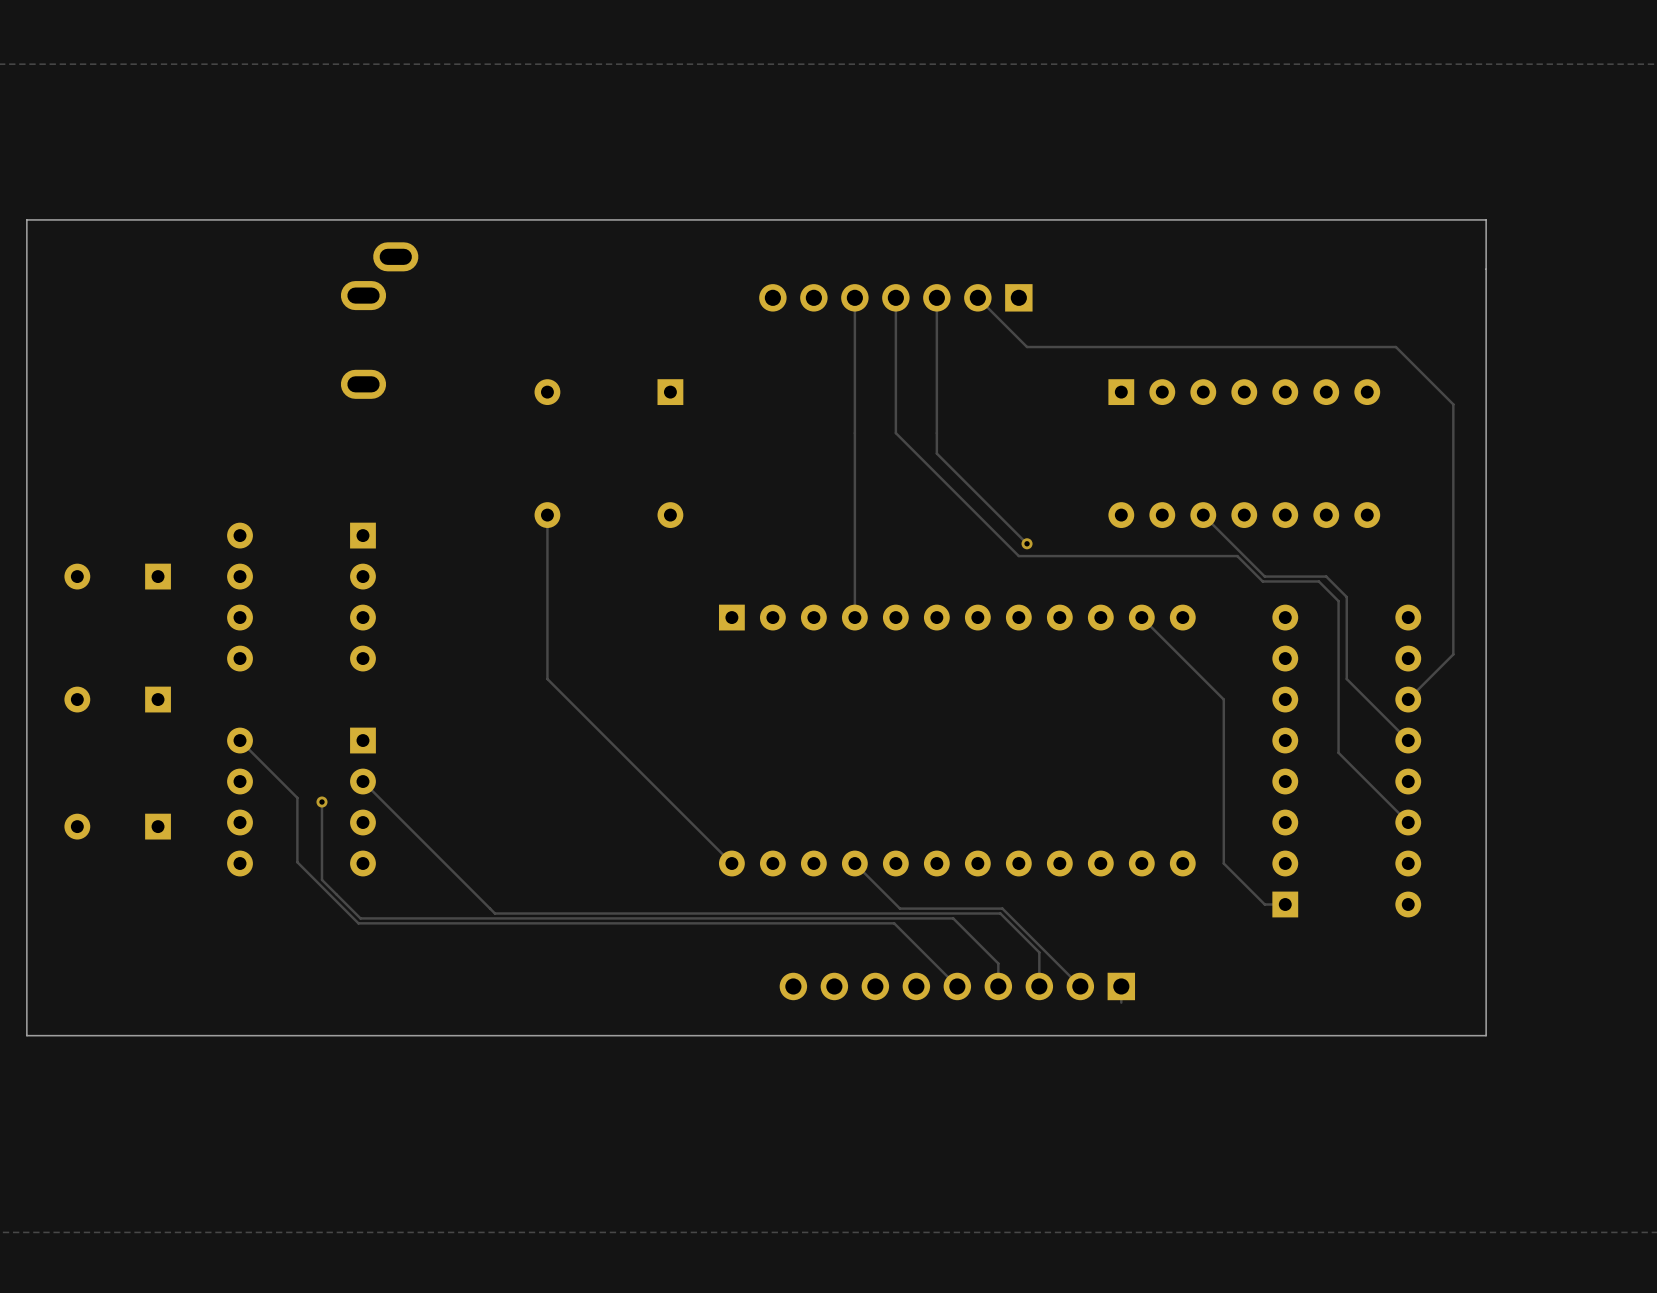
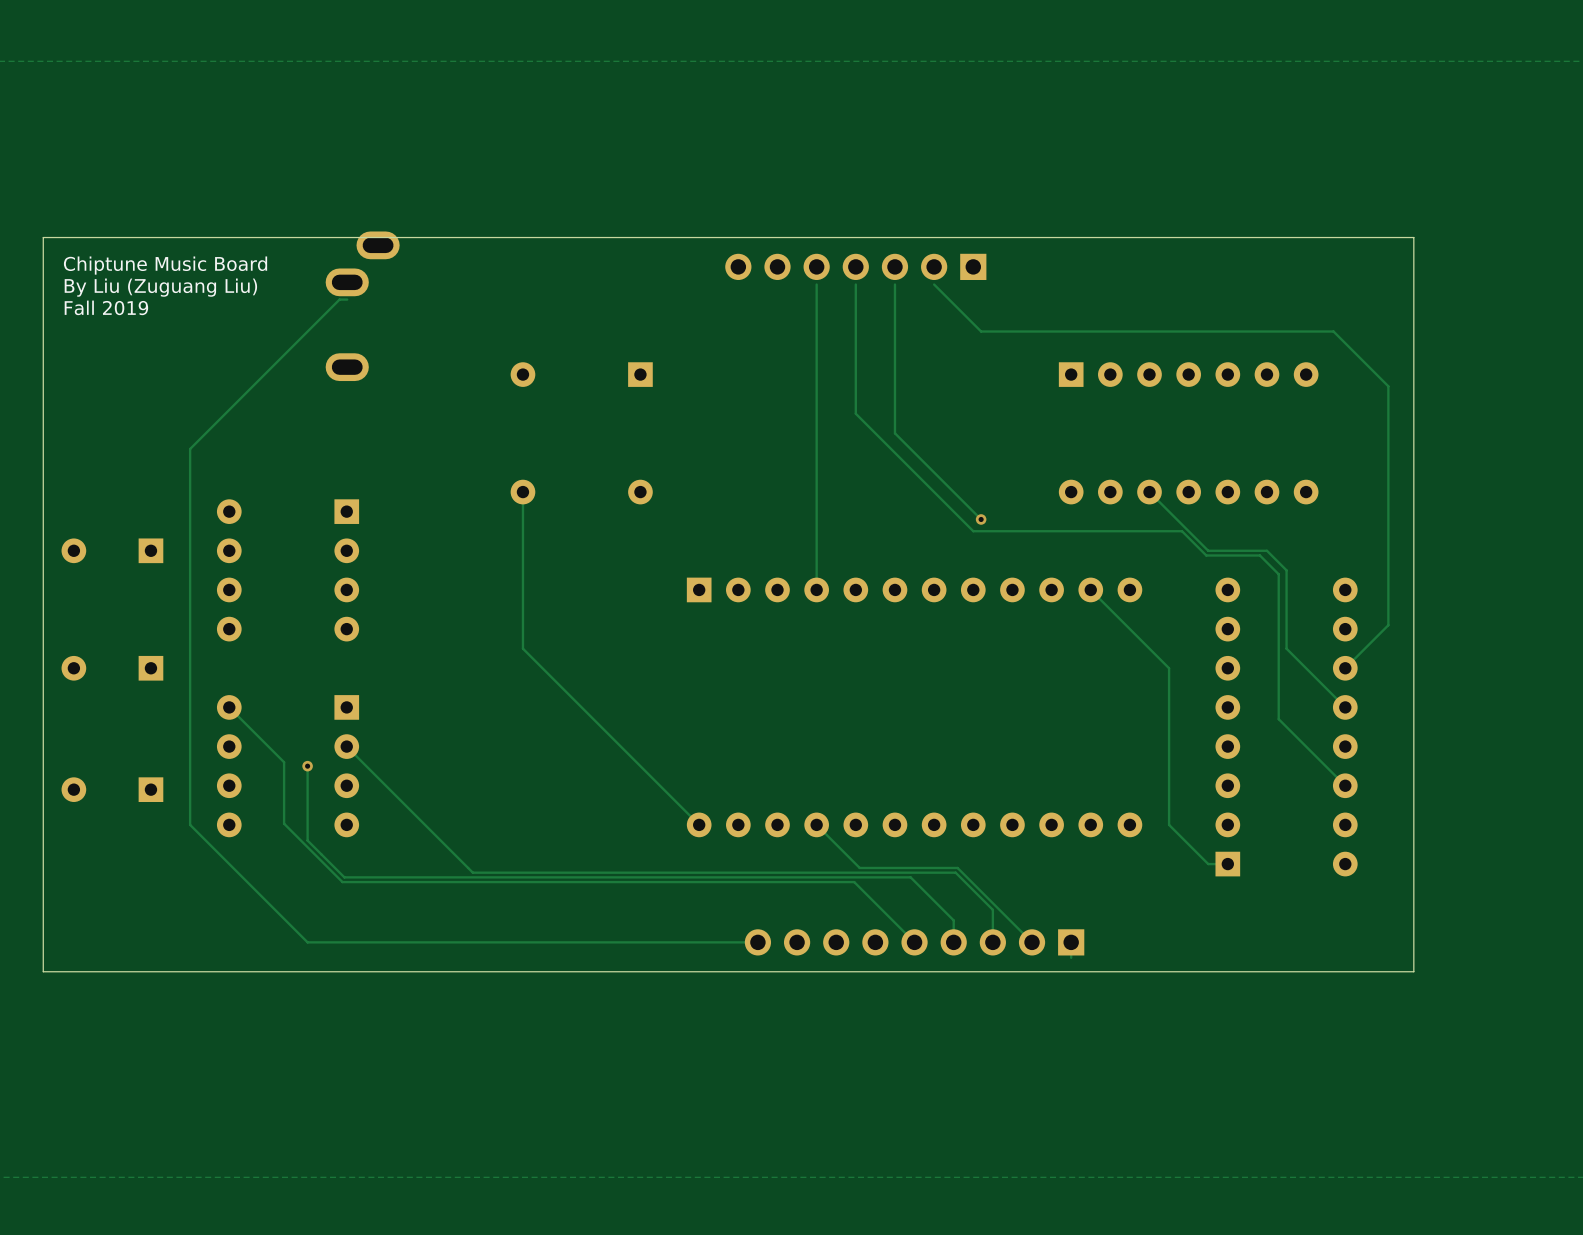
board edge: (1486, 219) (1486, 1035) (26, 1035) (26, 219) (1486, 219) -> (1413, 237) (1413, 971) (43, 971) (43, 237) (1413, 237)
text: none -> Chiptune Music Board (165, 265)
part position: (895, 297) -> (855, 266)
text: none -> By Liu (Zuguang Liu) (160, 287)
track: none -> (347, 299) (339, 299) (190, 449) (190, 824) (307, 942) (757, 942)
text: none -> Fall 2019 (106, 307)

